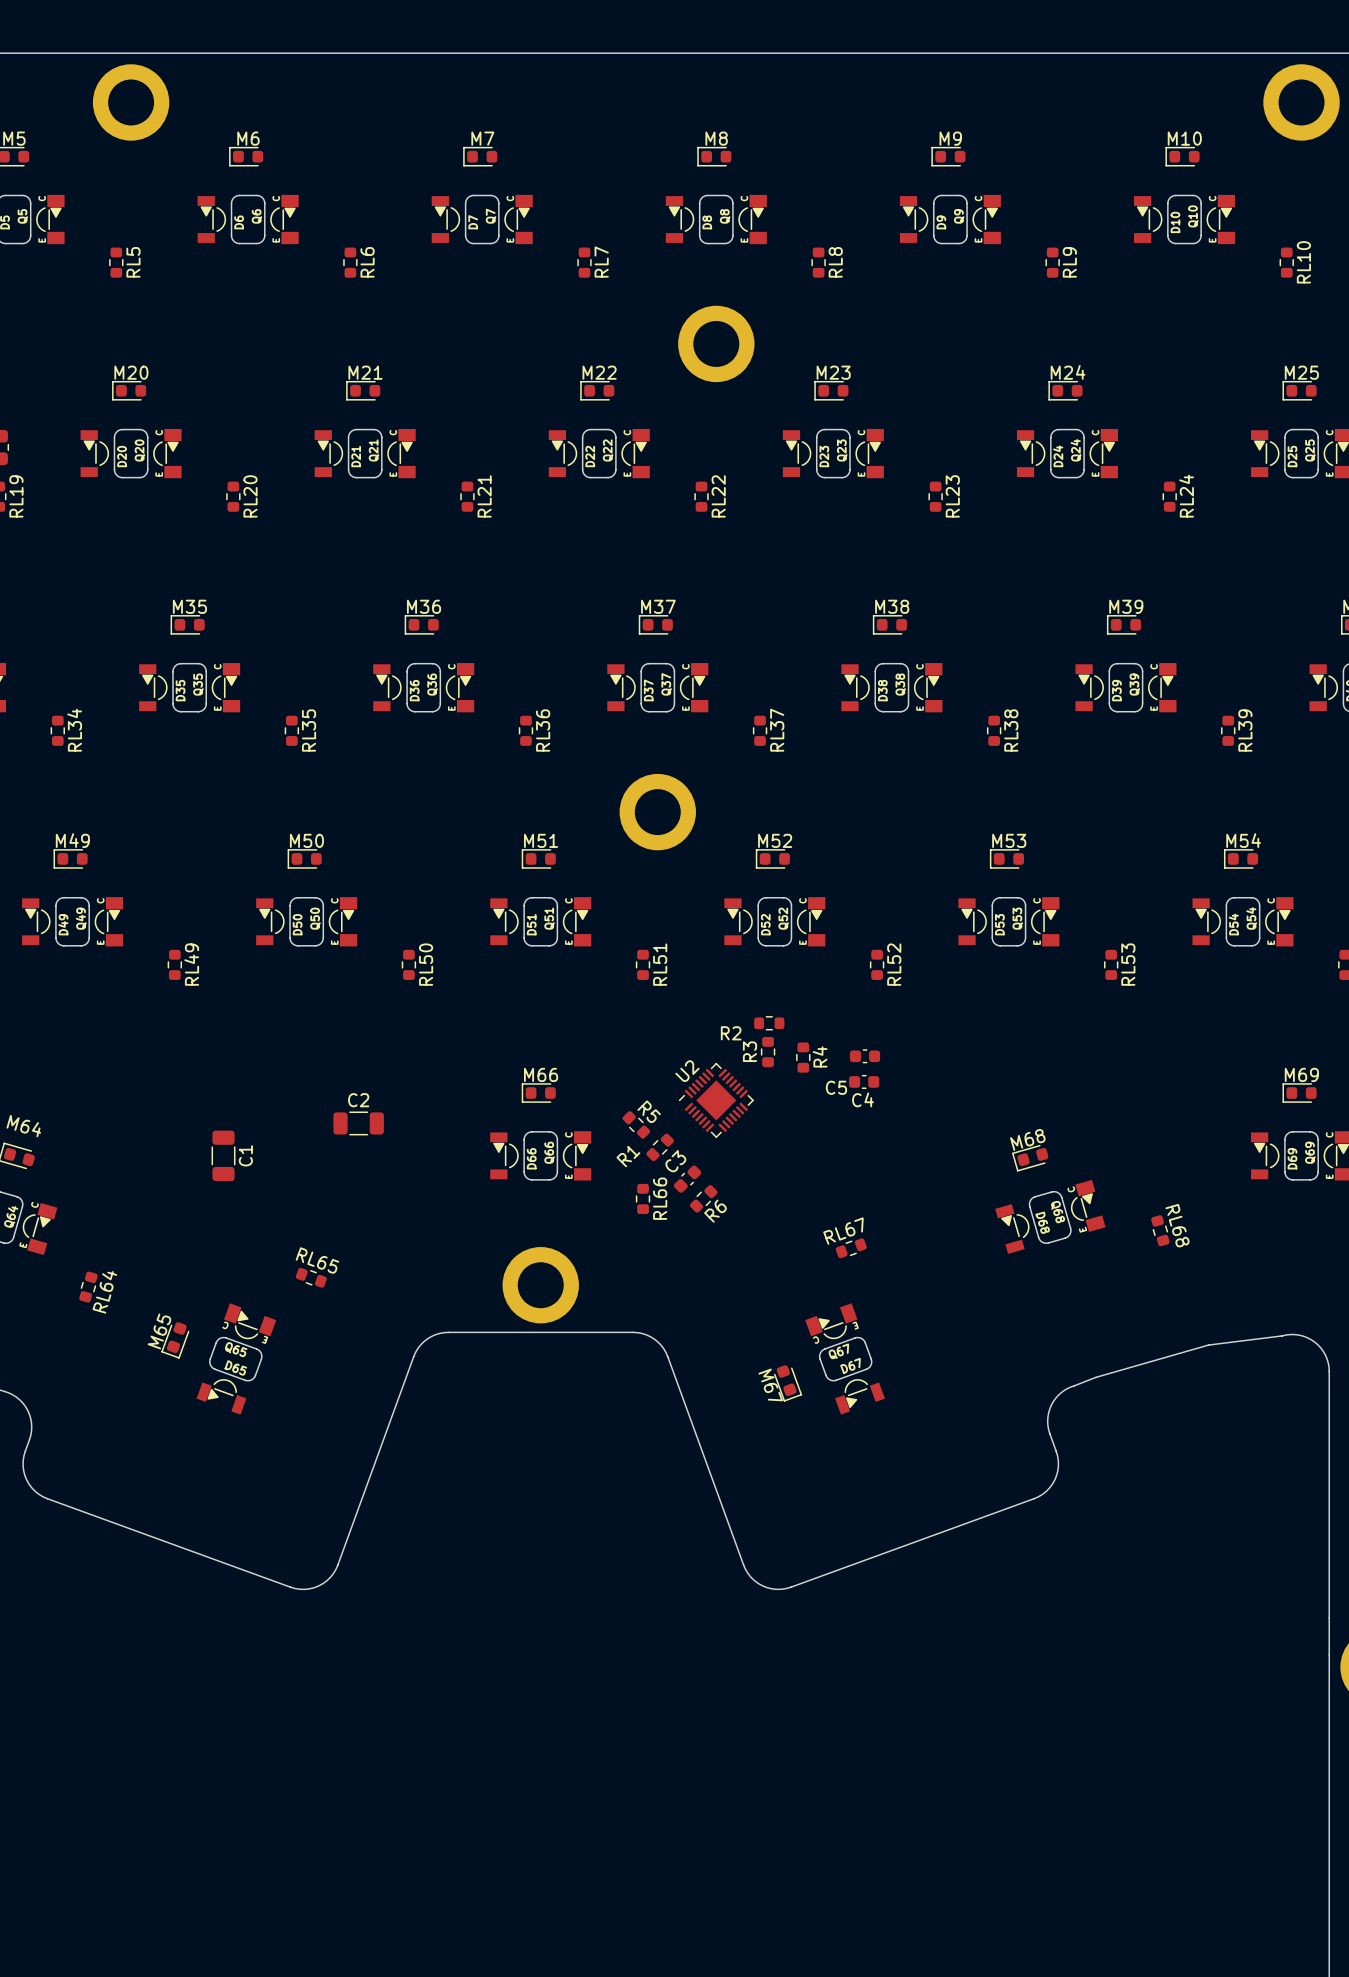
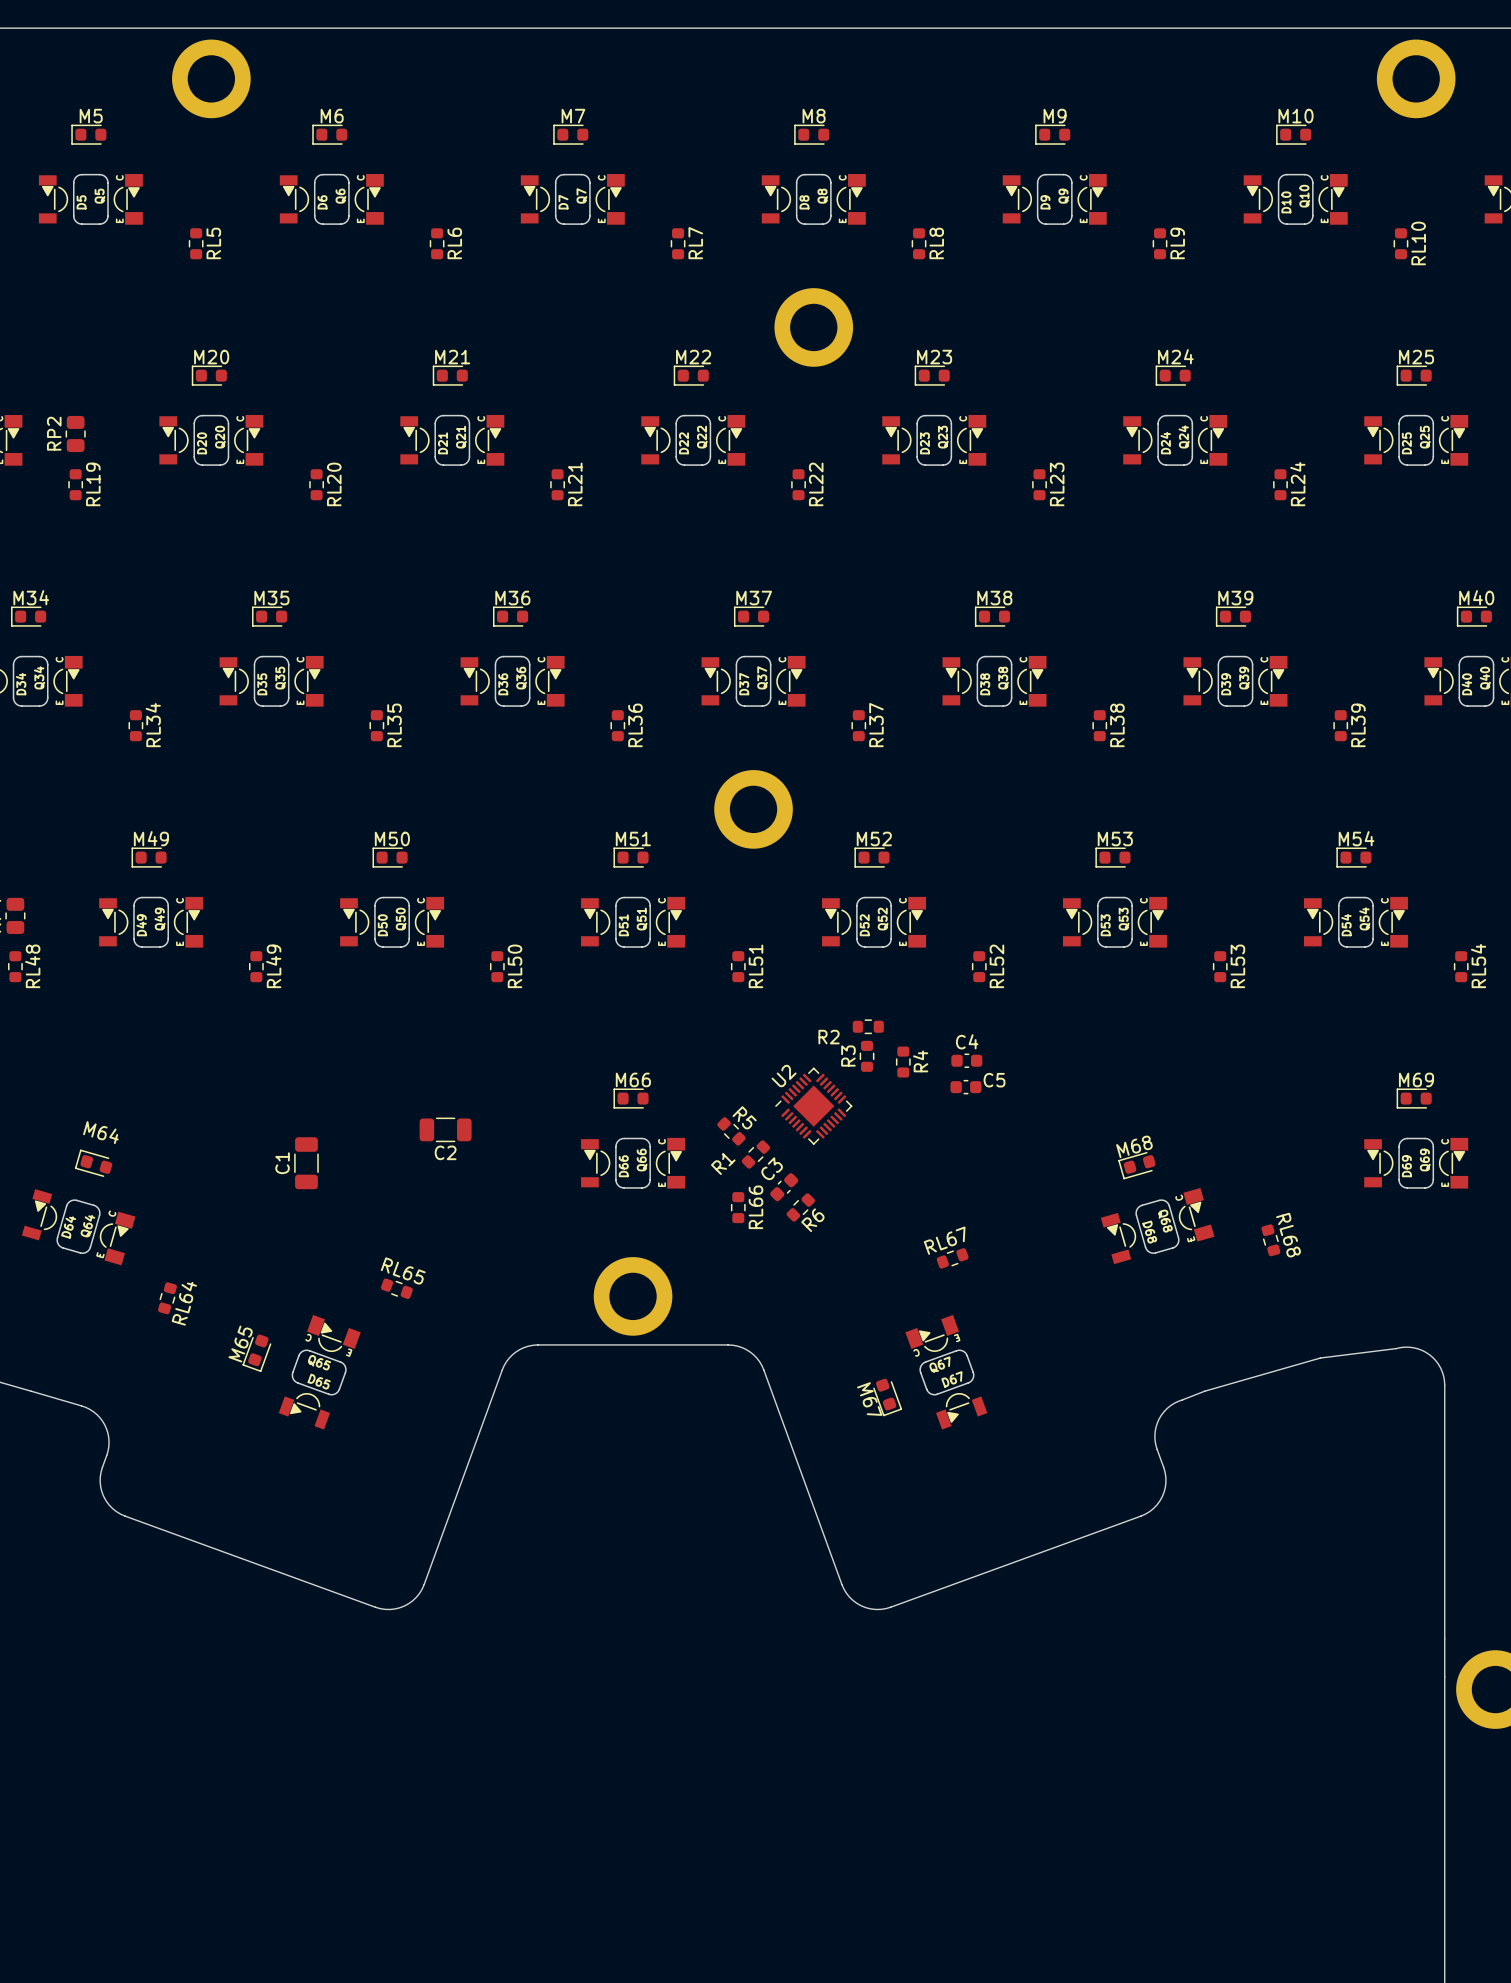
C5 name position: C5 (836, 1087) -> C5 (994, 1080)
C4 name position: C4 (862, 1099) -> C4 (967, 1041)
C2 name position: C2 (358, 1100) -> C2 (445, 1152)
C1 name position: C1 (245, 1155) -> C1 (282, 1163)

